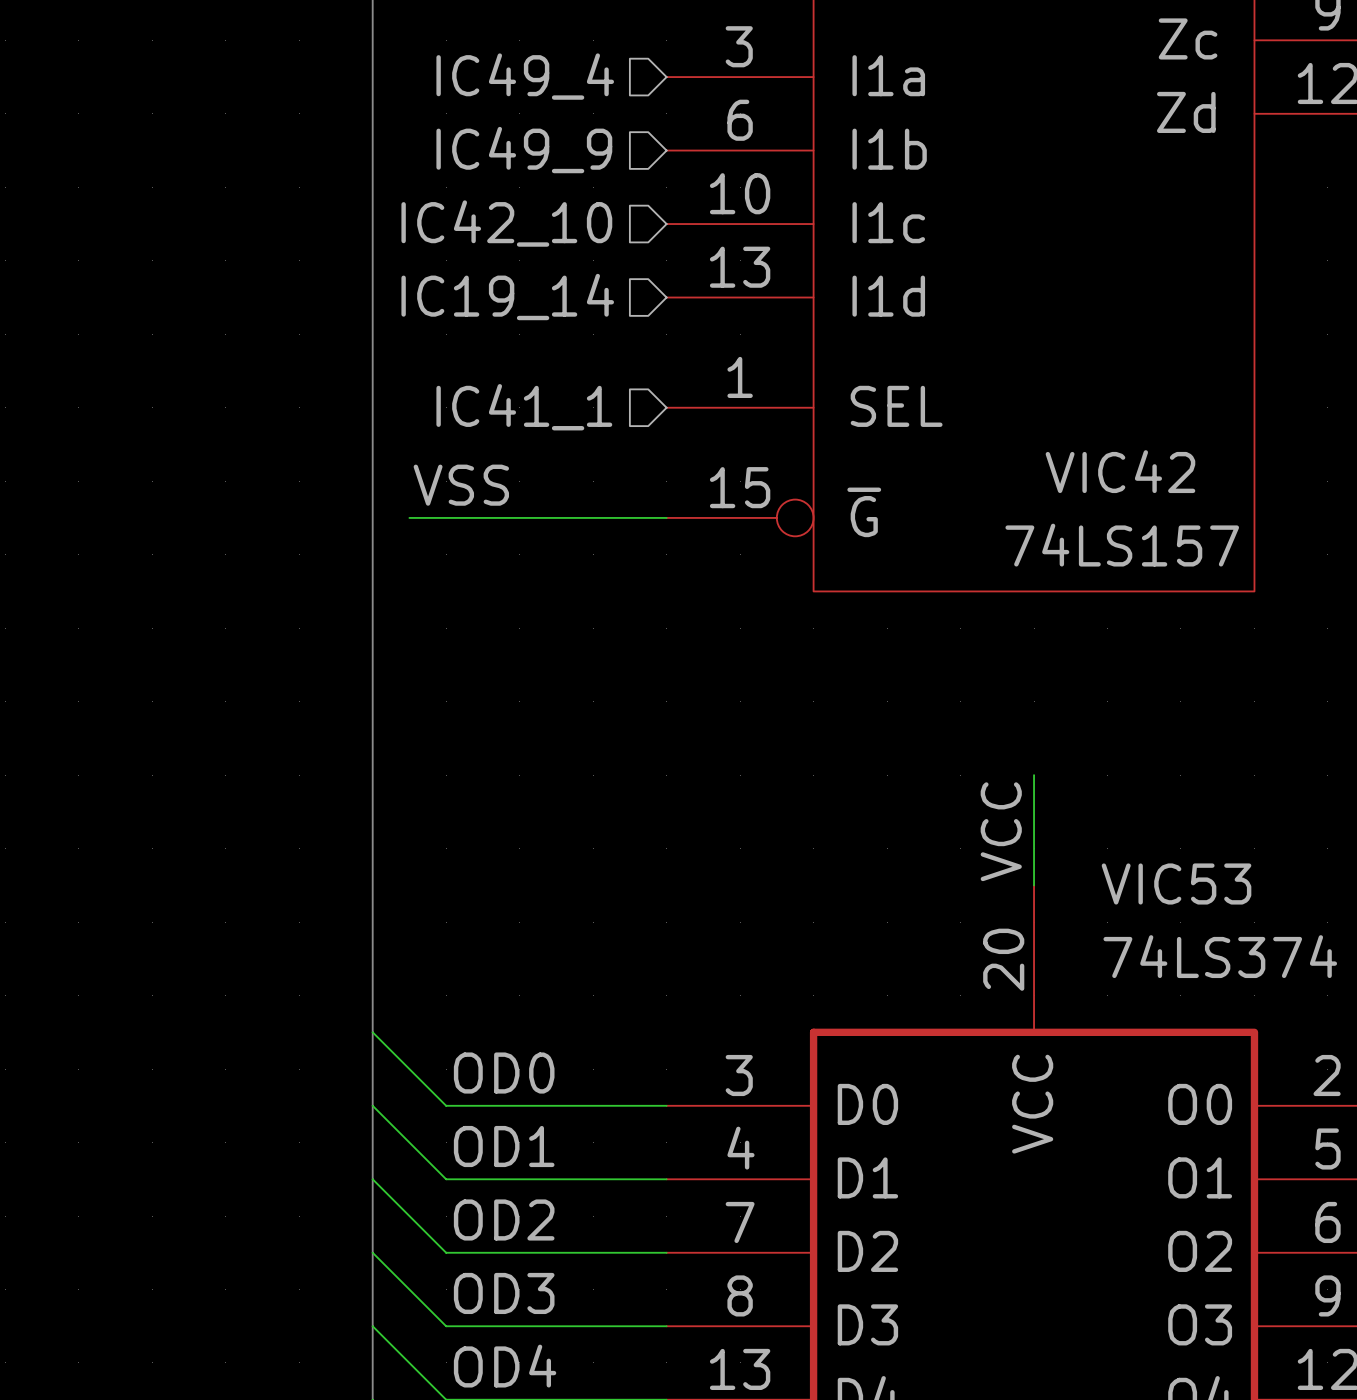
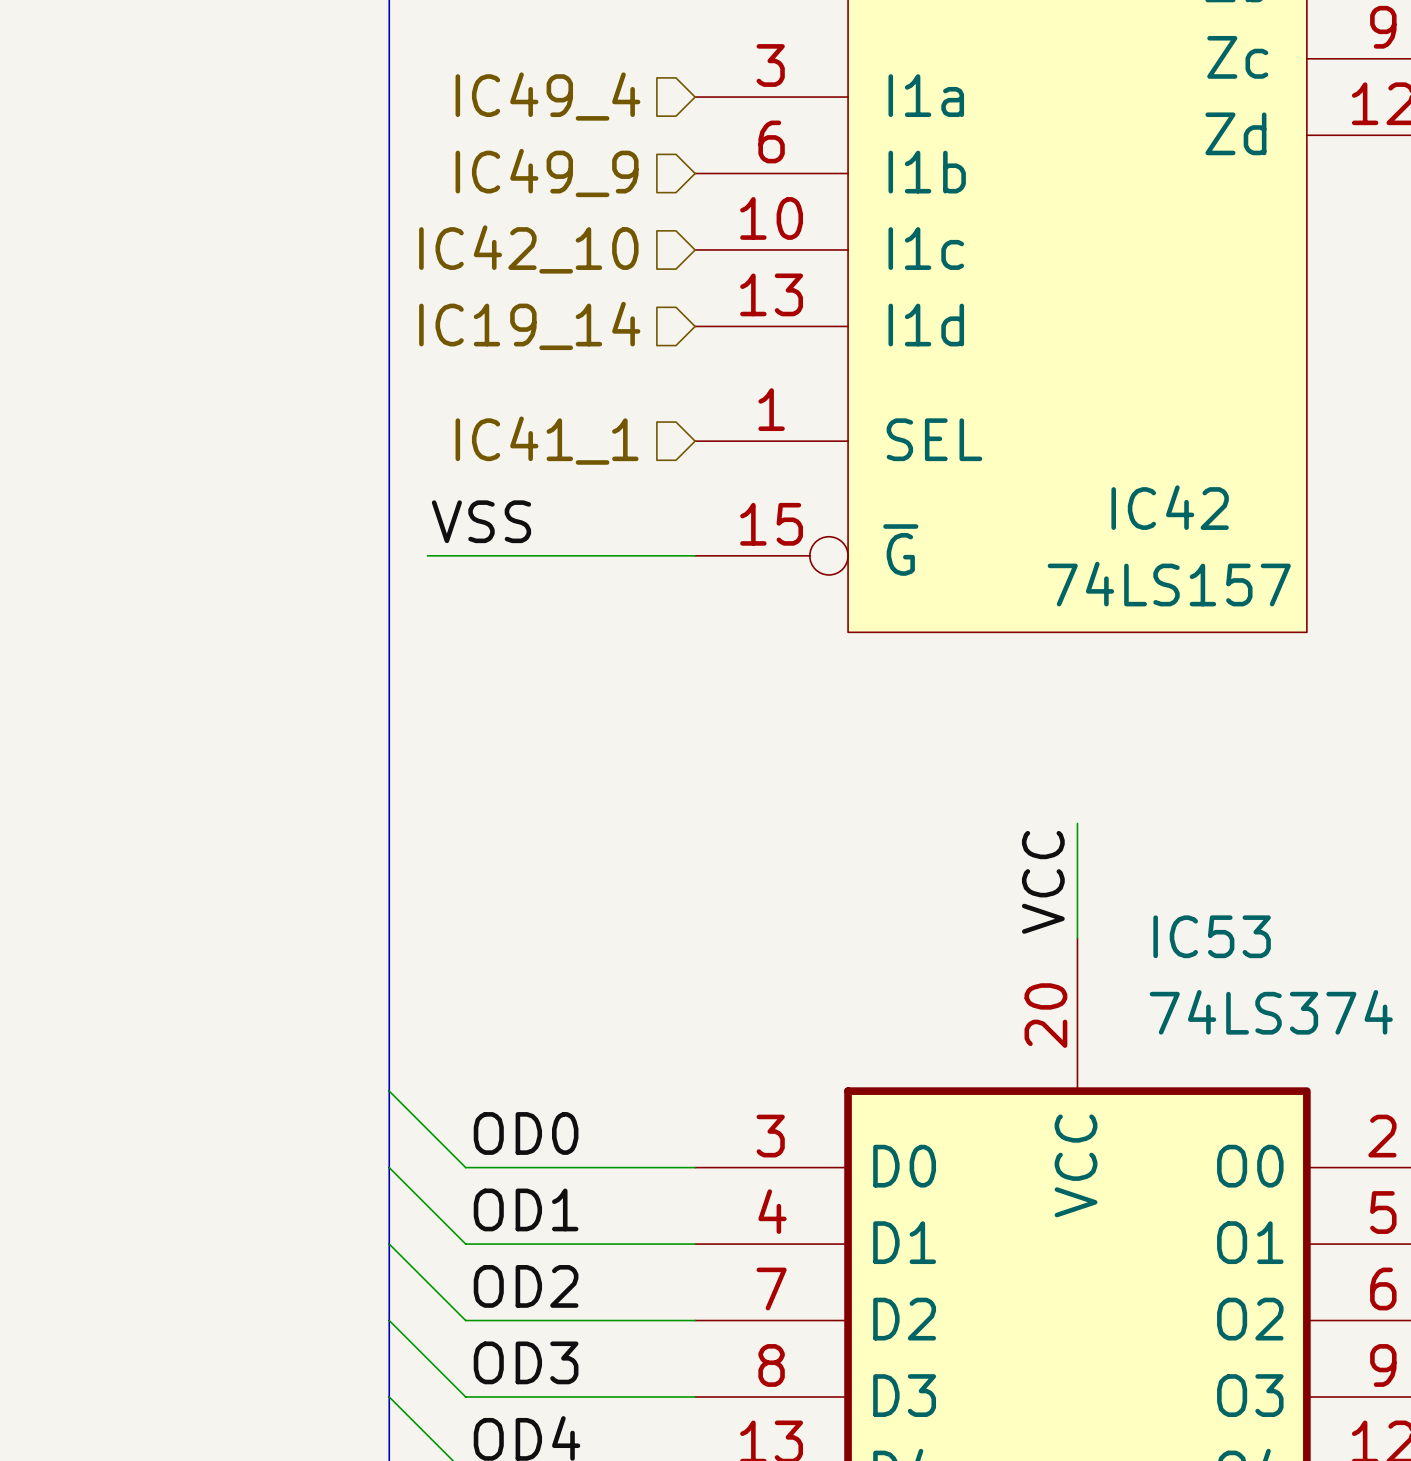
VIC42 name: VIC42 (1120, 471) -> IC42 (1170, 507)
VIC53 name: VIC53 (1176, 883) -> IC53 (1212, 936)

